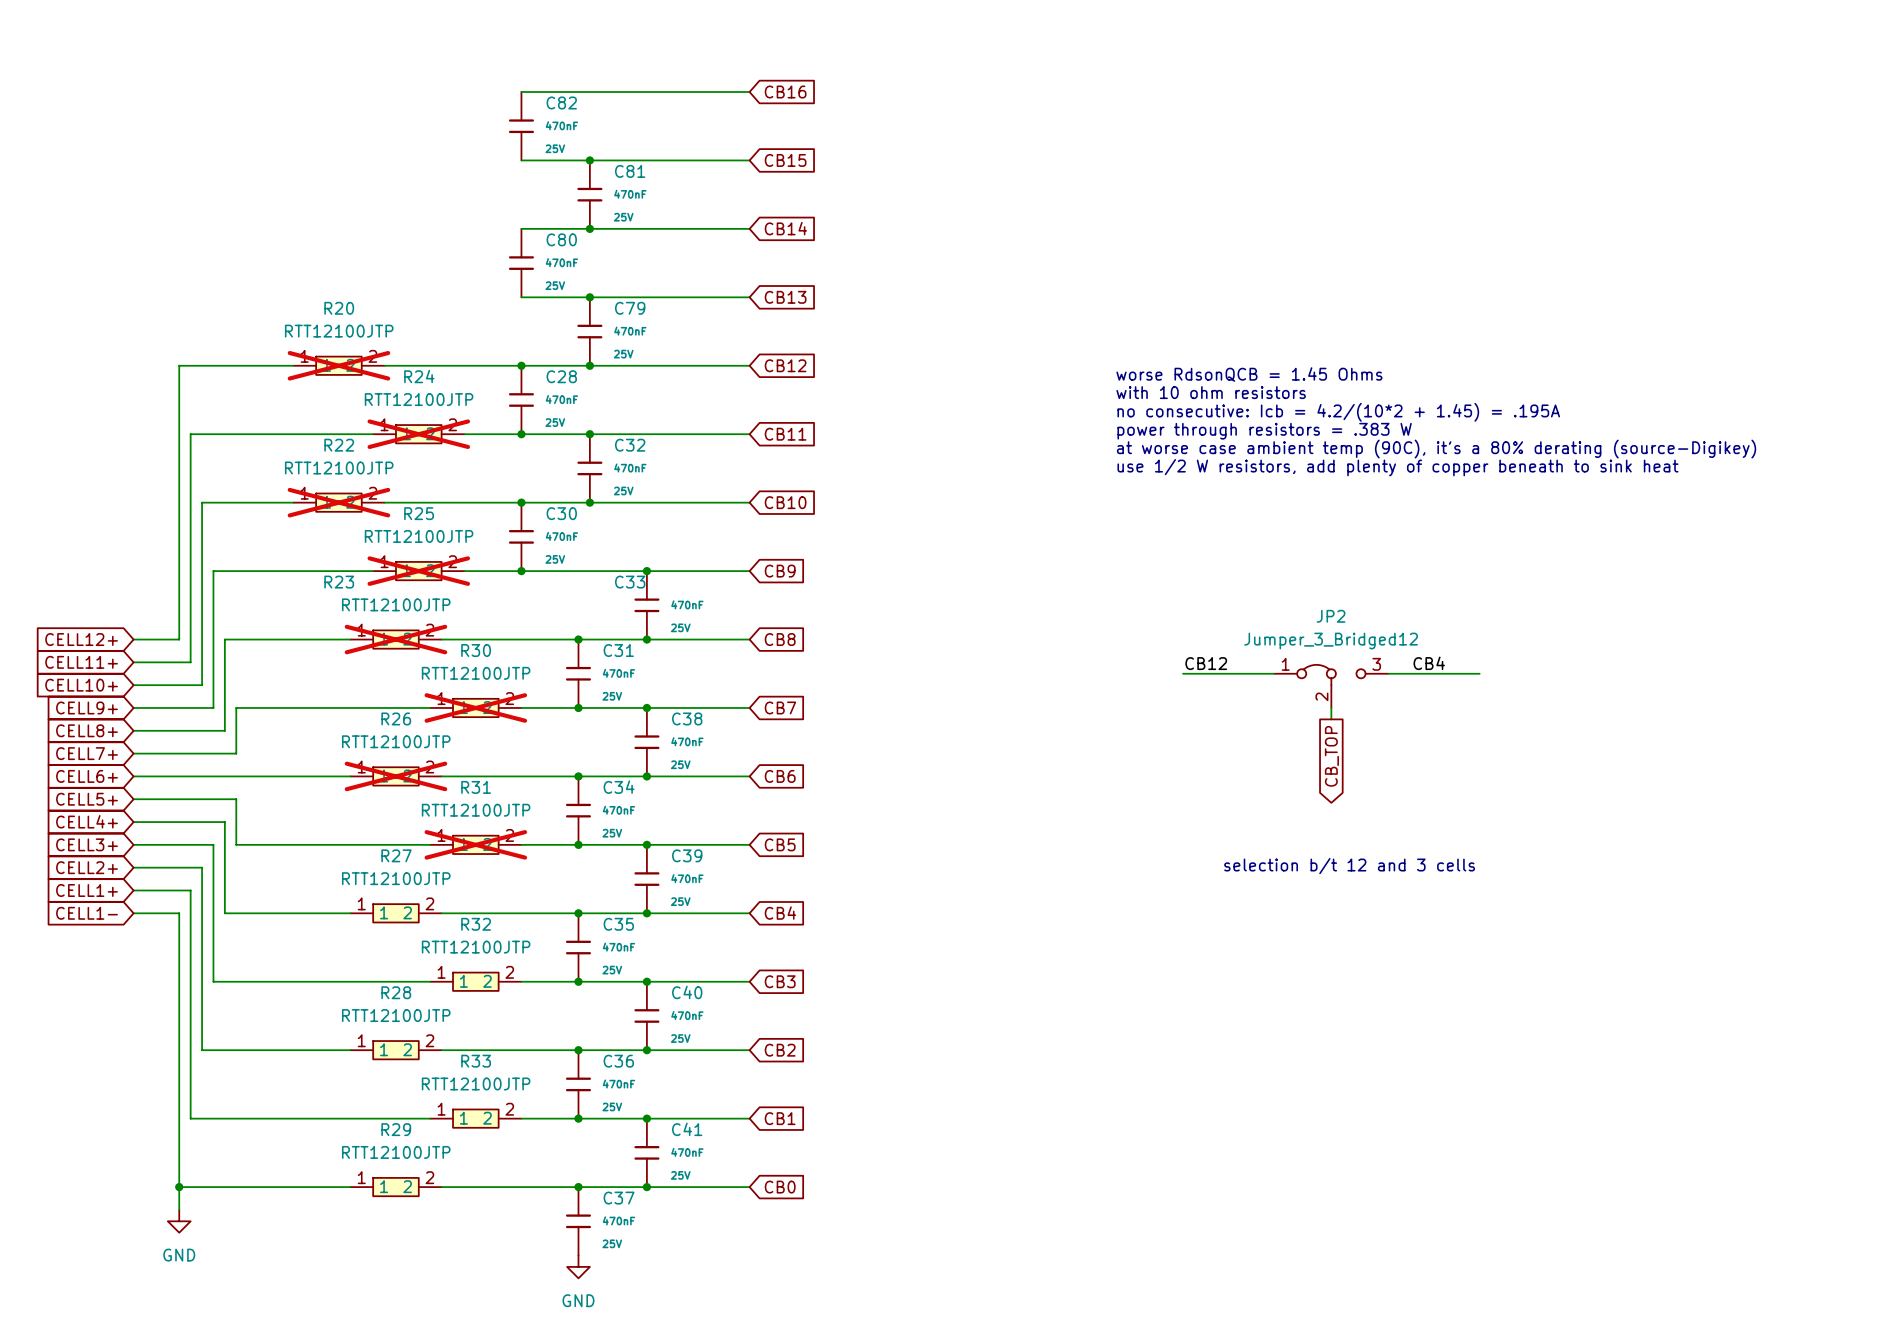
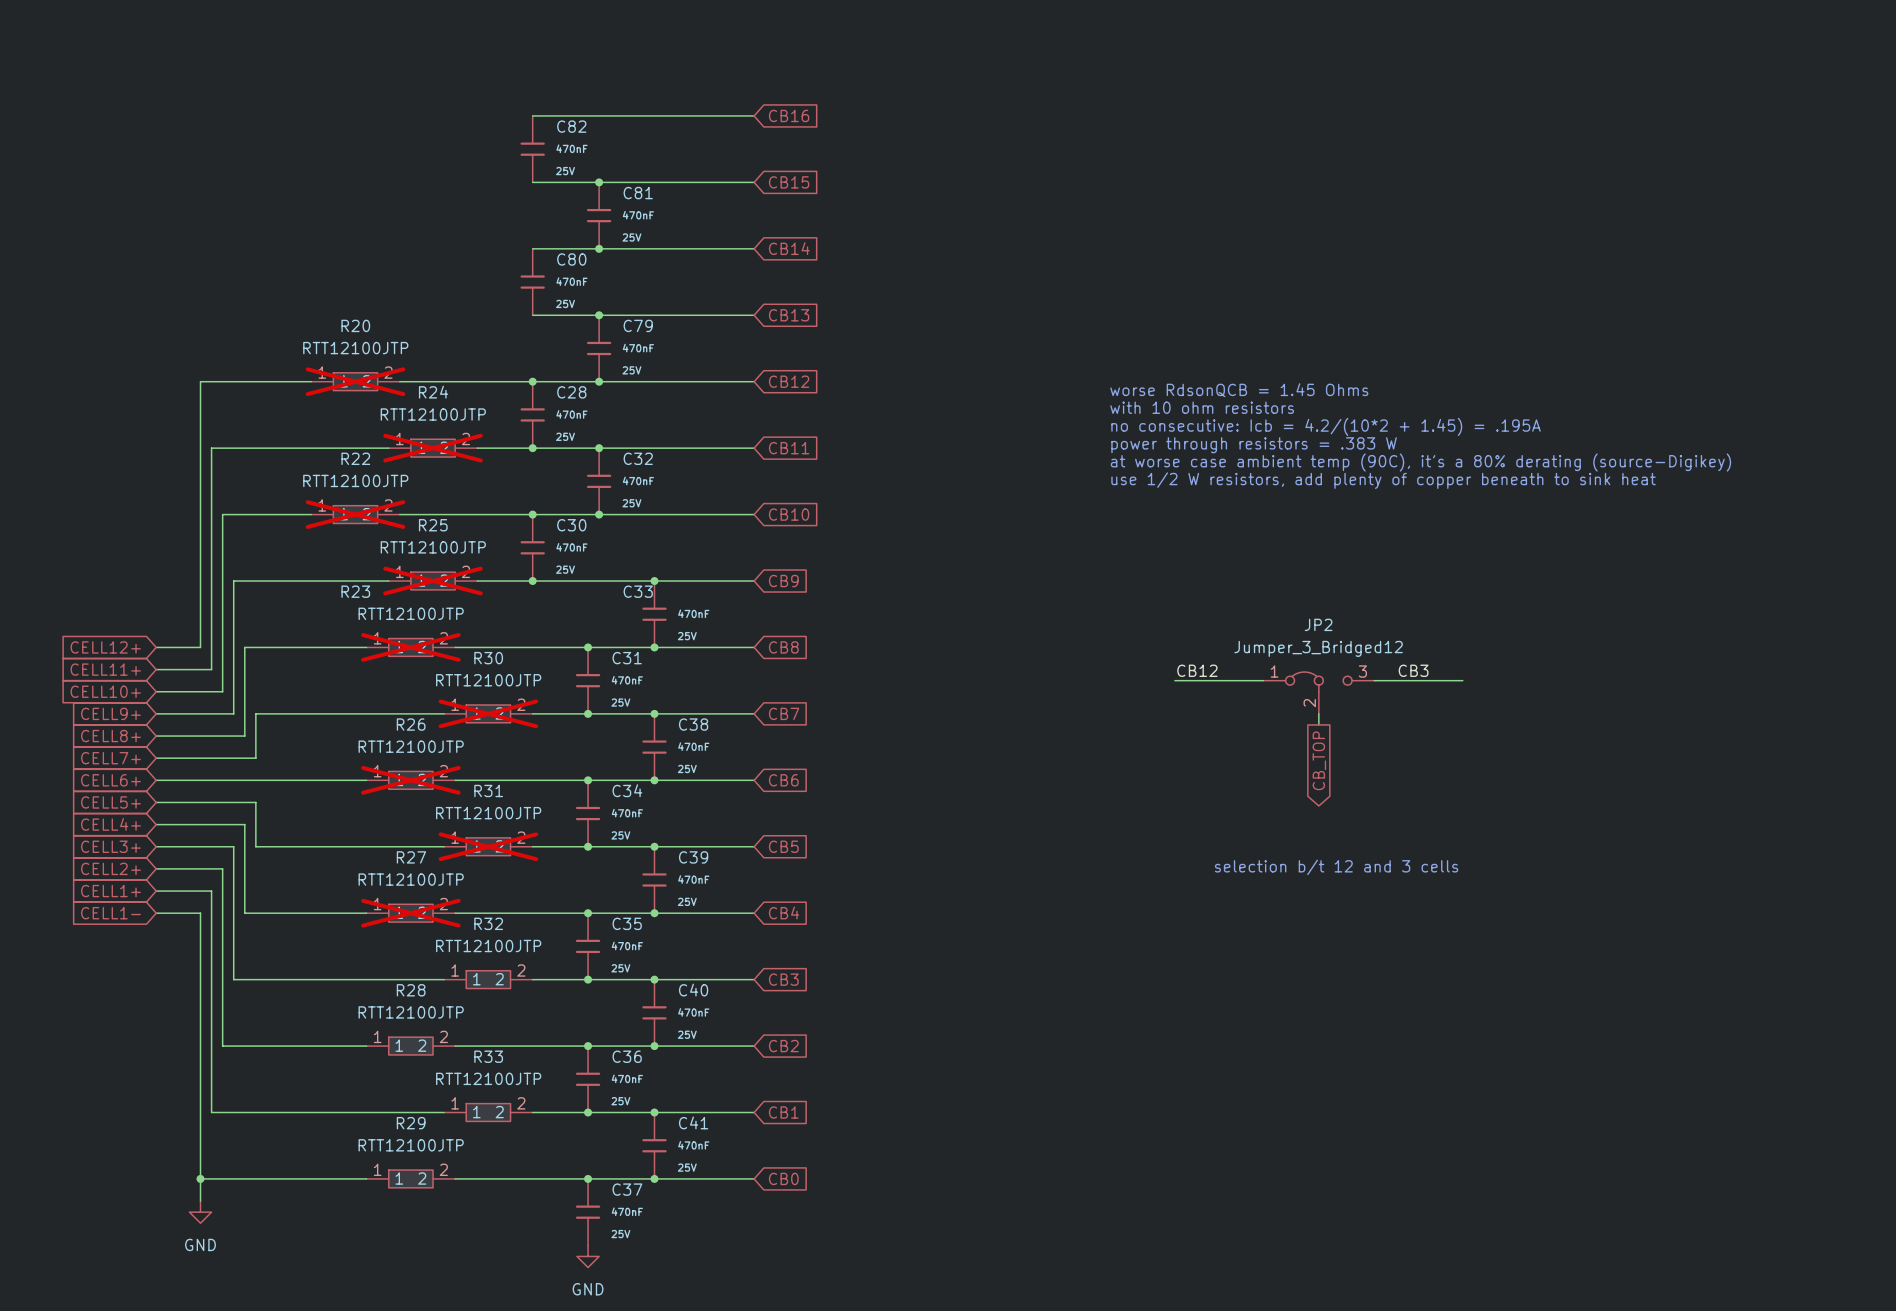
label: CB4 (1429, 663) -> CB3 (1413, 670)
R27 do-not-place cross: none -> (410, 913)

